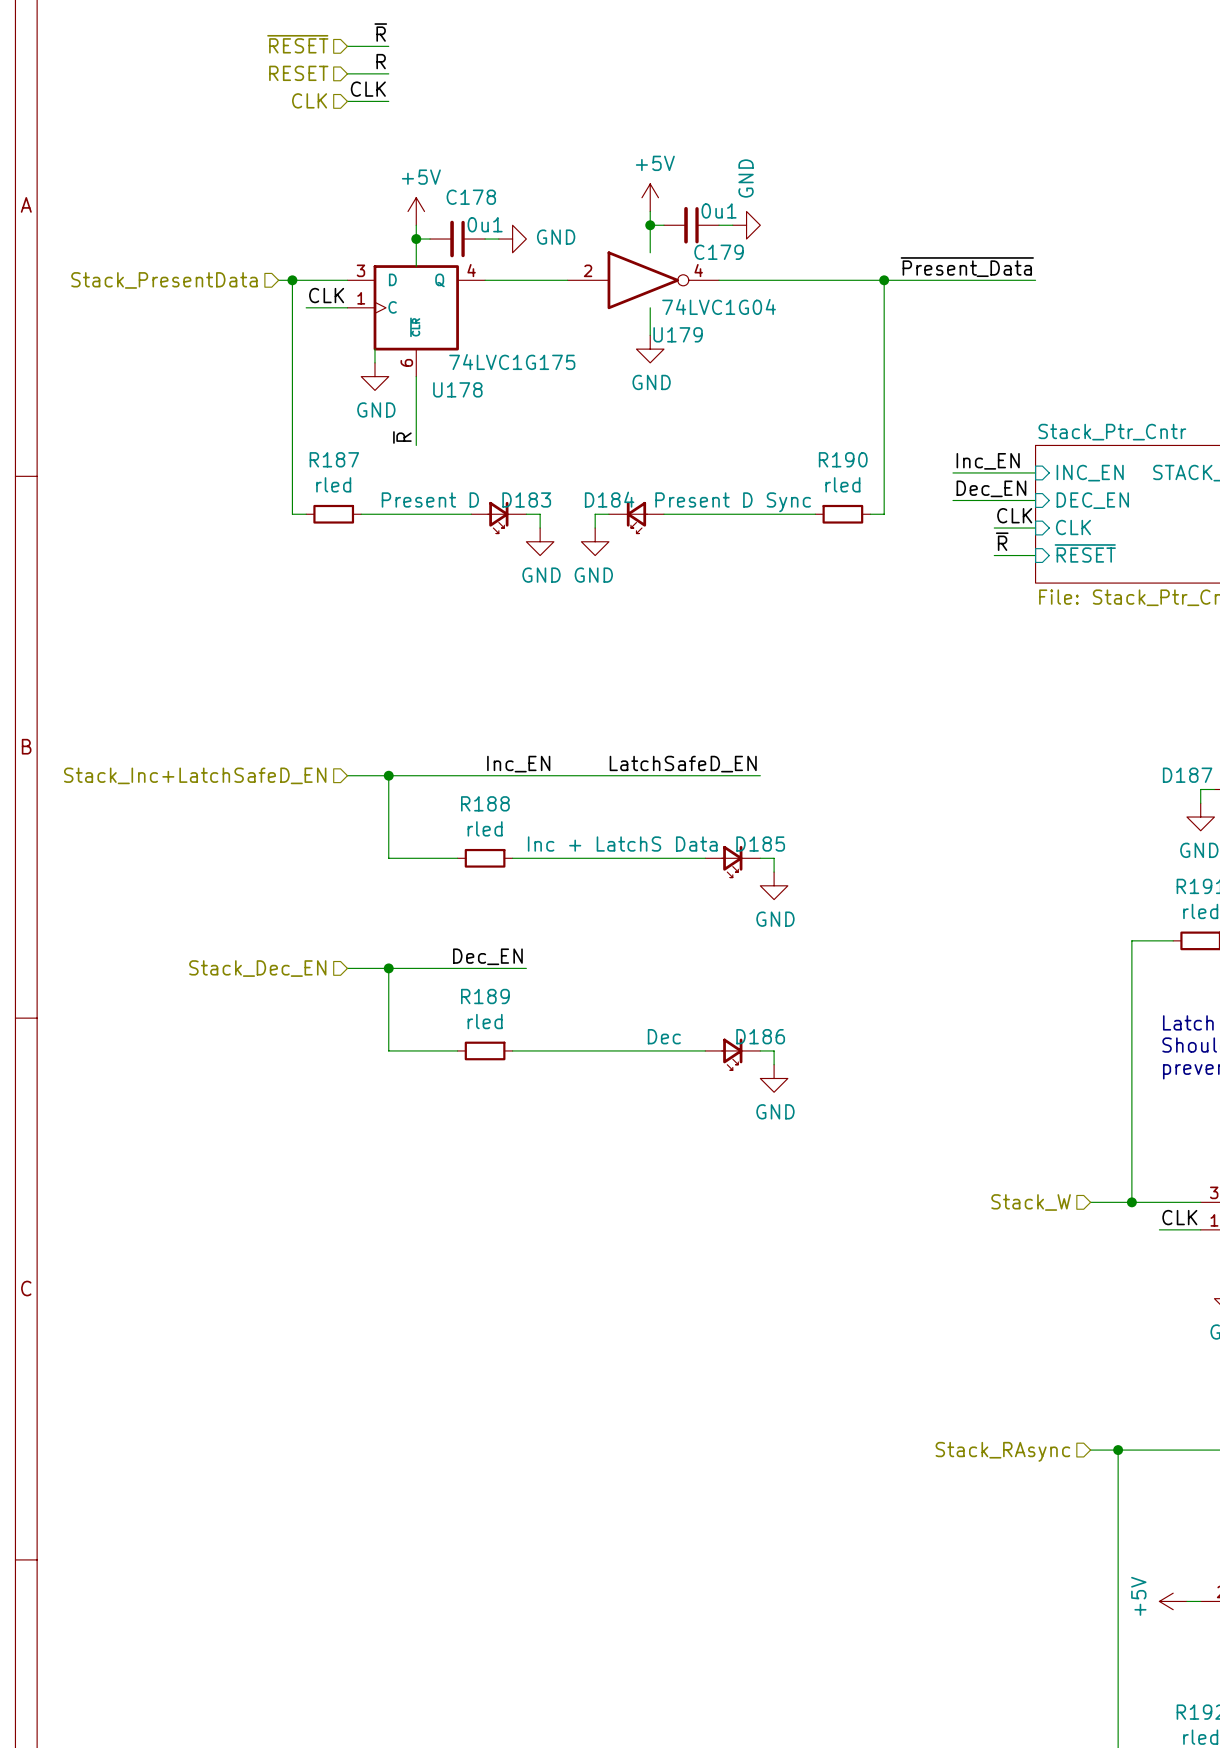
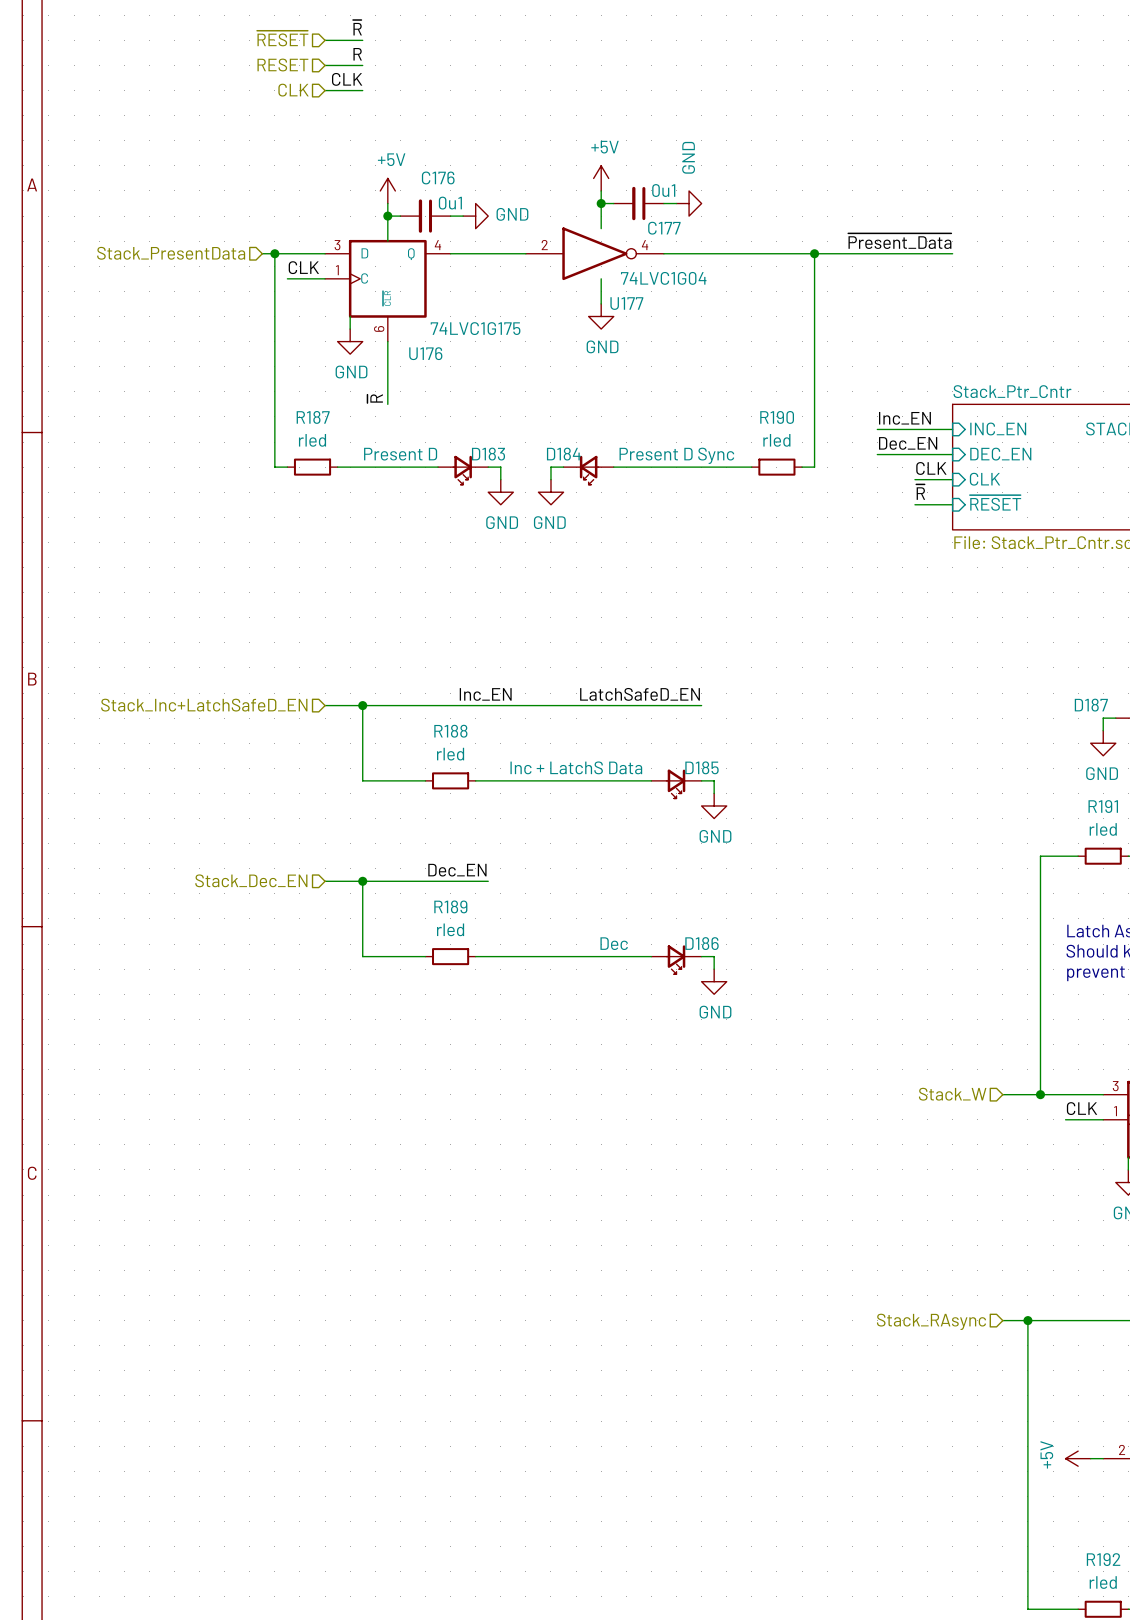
C178 name: C178 (471, 197) -> C176 (438, 177)
C179 name: C179 (719, 252) -> C177 (664, 228)
U179 name: U179 (678, 334) -> U177 (626, 303)
U178 name: U178 (457, 389) -> U176 (425, 353)

